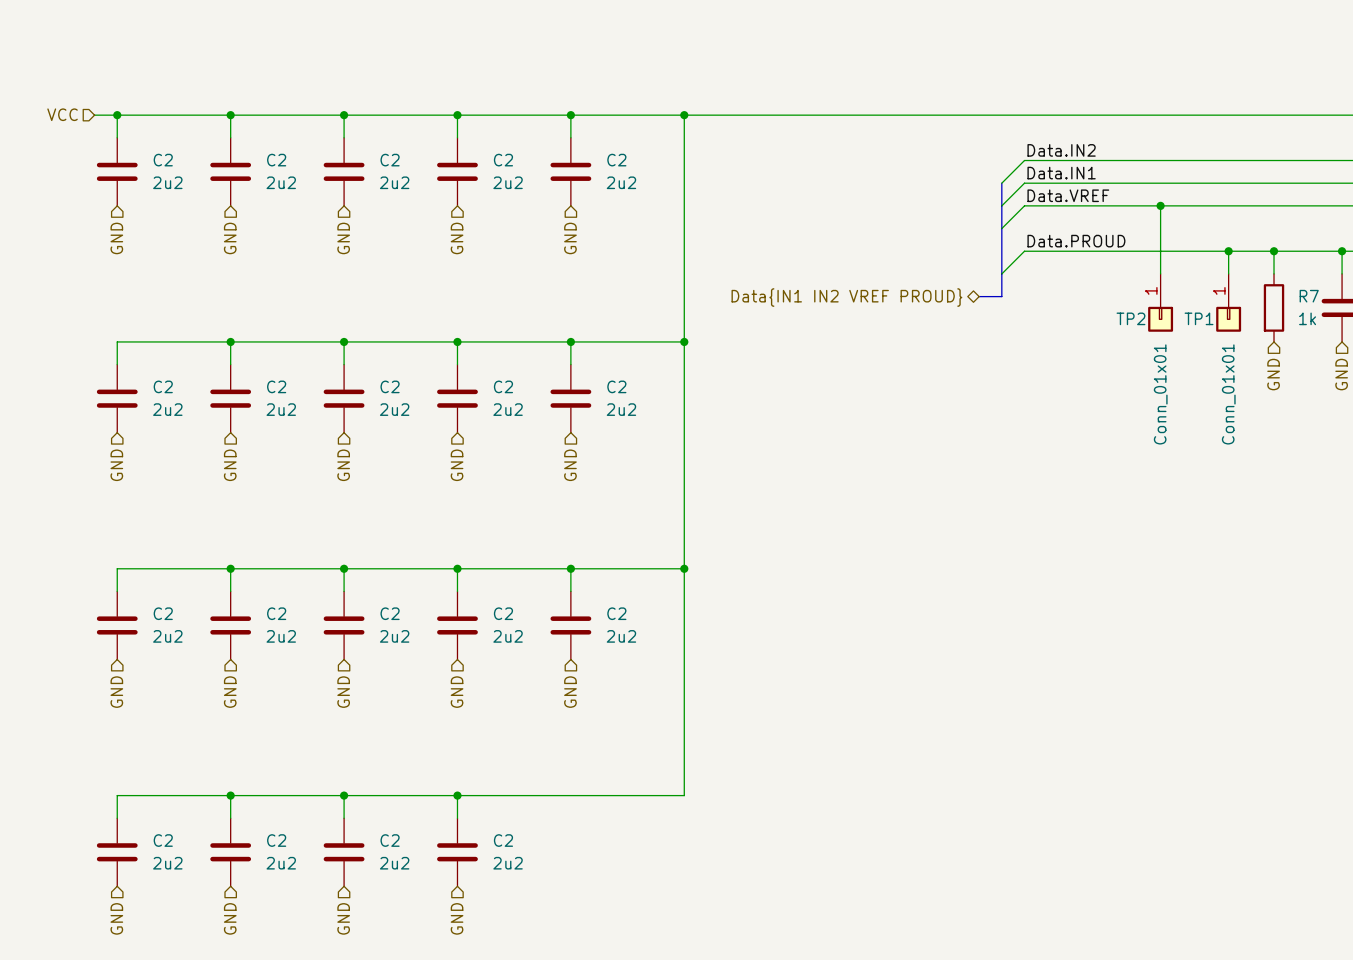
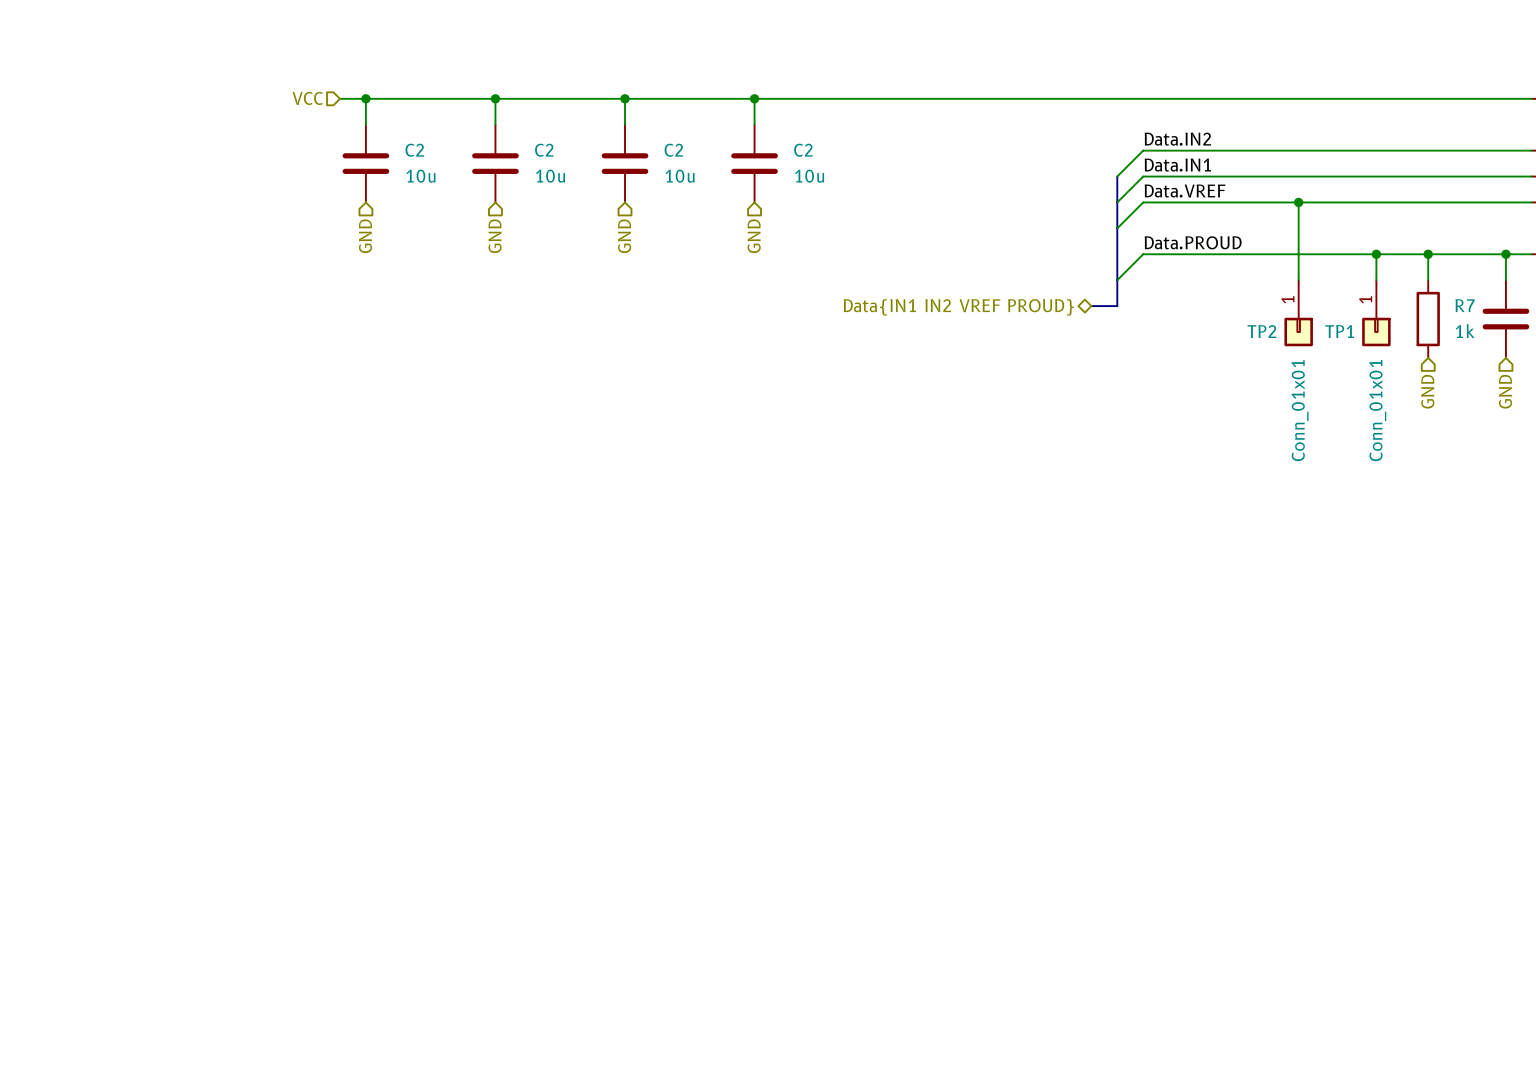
hierarchical label: VCC (62, 114) -> none
hierarchical label: none -> VCC (307, 98)
wire: (94, 115) (321, 115) -> none
wire: (117, 115) (117, 137) -> none
junction: (117, 115) -> none
wire: (230, 115) (230, 137) -> none
junction: (230, 115) -> none
wire: (684, 137) (684, 795) (117, 795) (117, 818) -> none
C2: 2u2 (117, 171) -> none
C2: 2u2 (230, 171) -> none
C2: none -> 10u (754, 163)
C2 value: 2u2 (394, 182) -> 10u (420, 176)
C2 value: 2u2 (508, 182) -> 10u (550, 176)
C2 value: 2u2 (621, 182) -> 10u (680, 176)
hierarchical label: GND (116, 238) -> none
hierarchical label: GND (230, 238) -> none
hierarchical label: none -> GND (754, 236)
wire: (230, 341) (230, 364) -> none
junction: (230, 341) -> none
wire: (344, 341) (344, 364) -> none
junction: (344, 341) -> none
wire: (457, 341) (457, 364) -> none
junction: (457, 341) -> none
wire: (570, 341) (570, 364) -> none
junction: (570, 341) -> none
wire: (684, 341) (117, 341) (117, 364) -> none
junction: (684, 341) -> none
C2: 2u2 (117, 398) -> none
C2: 2u2 (230, 398) -> none
C2: 2u2 (344, 398) -> none
C2: 2u2 (457, 398) -> none
C2: 2u2 (570, 398) -> none
hierarchical label: GND (116, 465) -> none
hierarchical label: GND (230, 465) -> none
hierarchical label: GND (343, 465) -> none
hierarchical label: GND (457, 465) -> none
hierarchical label: GND (570, 465) -> none
wire: (230, 568) (230, 591) -> none
junction: (230, 568) -> none
wire: (344, 568) (344, 591) -> none
junction: (344, 568) -> none
wire: (457, 568) (457, 591) -> none
junction: (457, 568) -> none
wire: (570, 568) (570, 591) -> none
junction: (570, 568) -> none
wire: (684, 568) (117, 568) (117, 591) -> none
junction: (684, 568) -> none
C2: 2u2 (117, 625) -> none
C2: 2u2 (230, 625) -> none
C2: 2u2 (344, 625) -> none
C2: 2u2 (457, 625) -> none
C2: 2u2 (570, 625) -> none
hierarchical label: GND (116, 692) -> none
hierarchical label: GND (230, 692) -> none
hierarchical label: GND (343, 692) -> none
hierarchical label: GND (457, 692) -> none
hierarchical label: GND (570, 692) -> none
wire: (230, 795) (230, 818) -> none
junction: (230, 795) -> none
wire: (344, 795) (344, 818) -> none
junction: (344, 795) -> none
wire: (457, 795) (457, 818) -> none
junction: (457, 795) -> none
C2: 2u2 (117, 852) -> none
C2: 2u2 (230, 852) -> none
C2: 2u2 (344, 852) -> none
C2: 2u2 (457, 852) -> none
hierarchical label: GND (116, 918) -> none
hierarchical label: GND (230, 918) -> none
hierarchical label: GND (343, 918) -> none
hierarchical label: GND (457, 918) -> none

